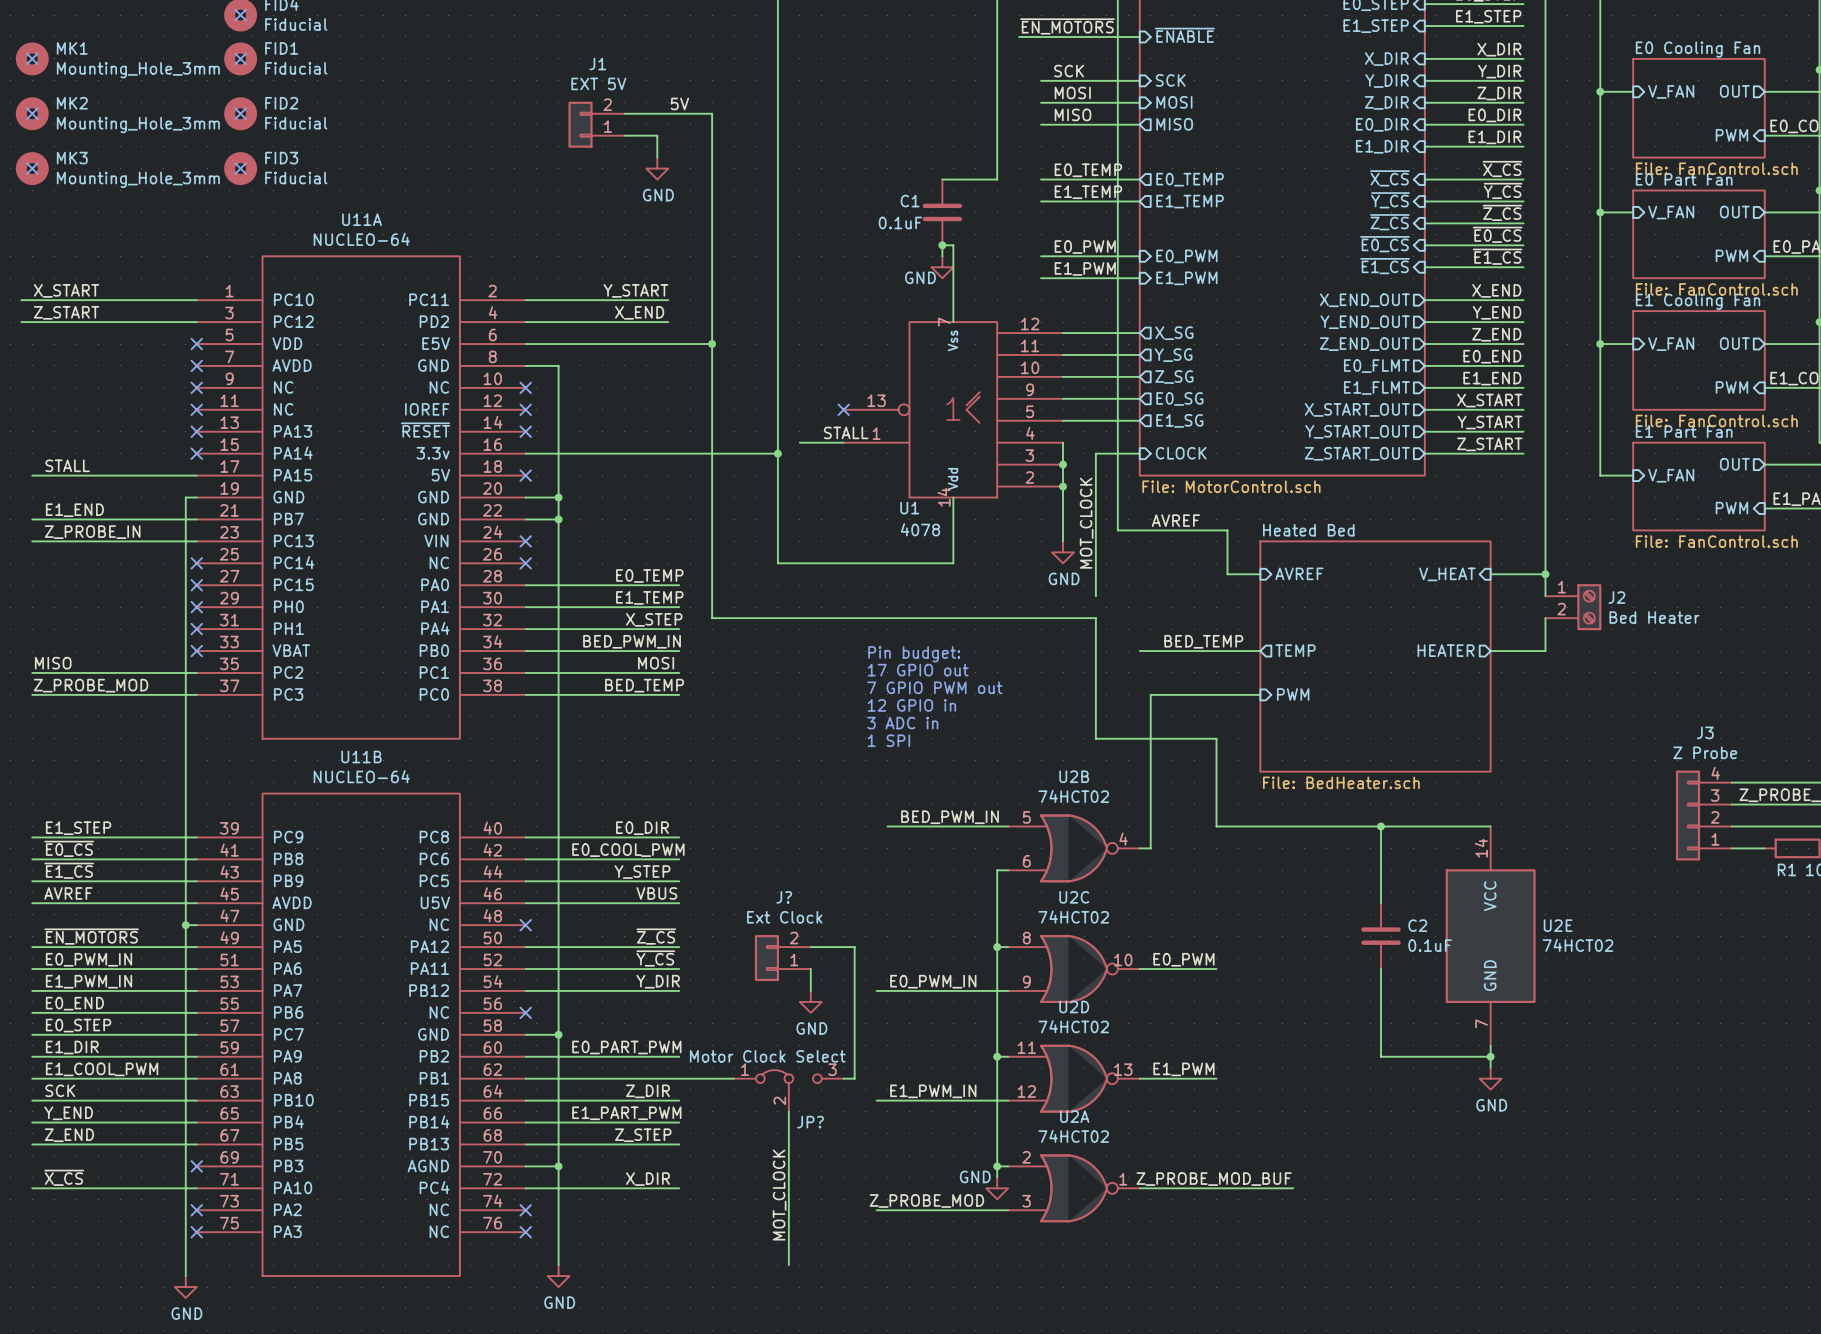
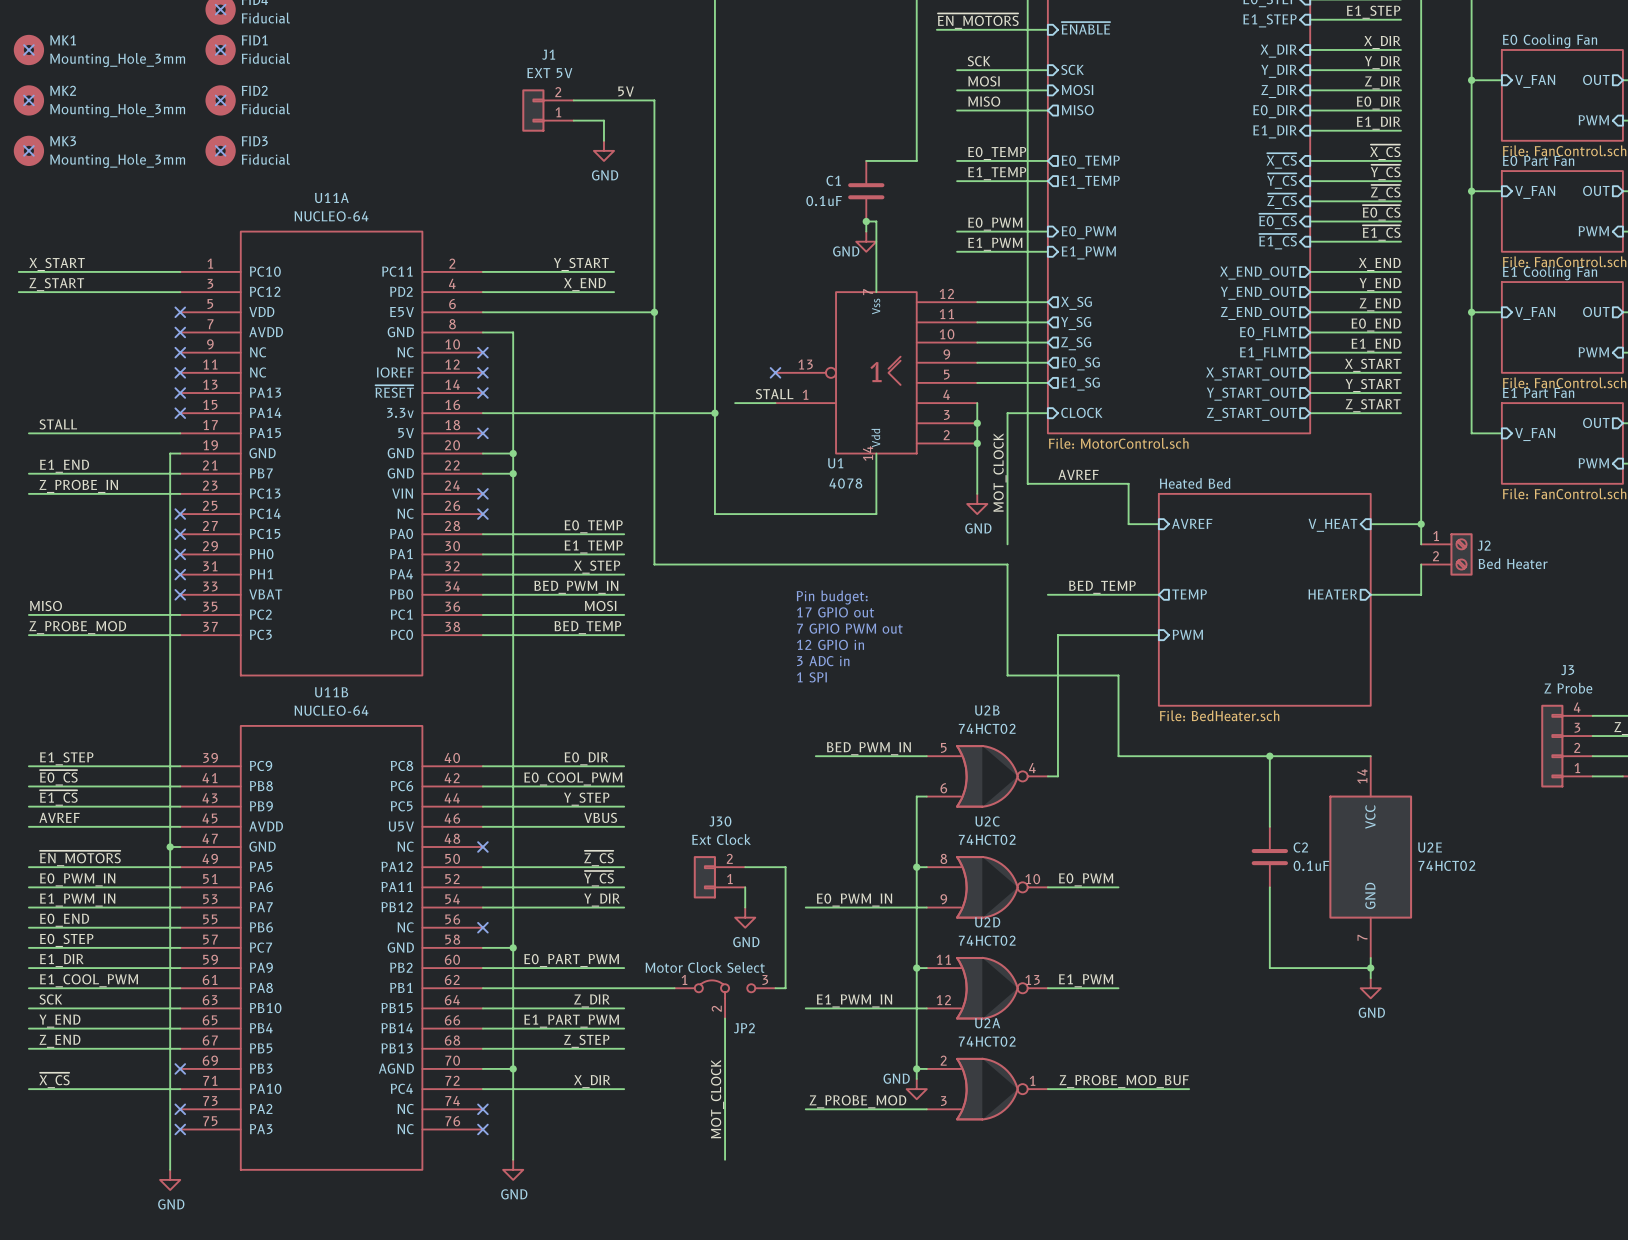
J? name: J? (784, 897) -> J30 (720, 821)
JP? name: JP? (810, 1122) -> JP2 (744, 1028)

